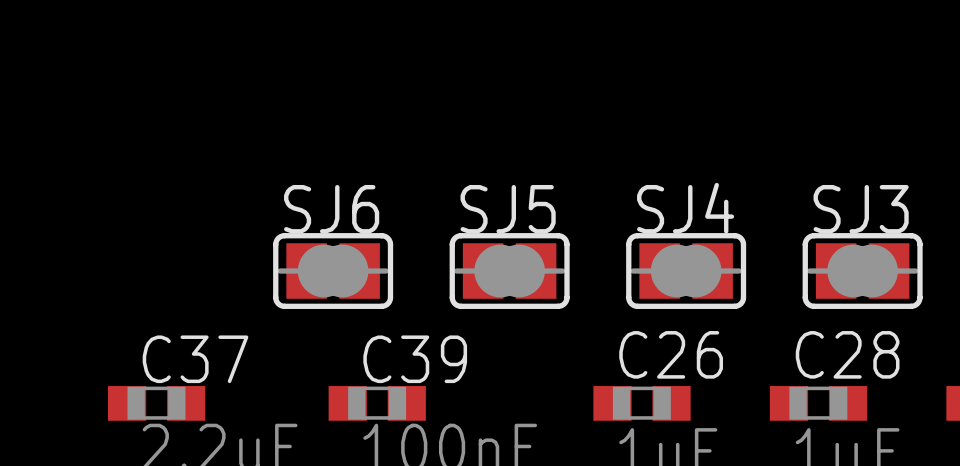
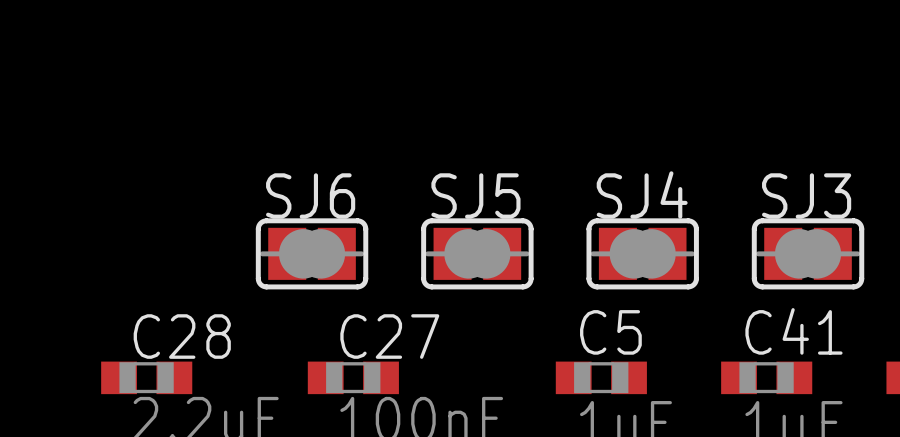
C26 name: C26 (671, 354) -> C5 (610, 332)
C28 name: C28 (847, 354) -> C41 (793, 331)
C37 name: C37 (195, 359) -> C28 (182, 336)
C39 name: C39 (415, 359) -> C27 (389, 336)

